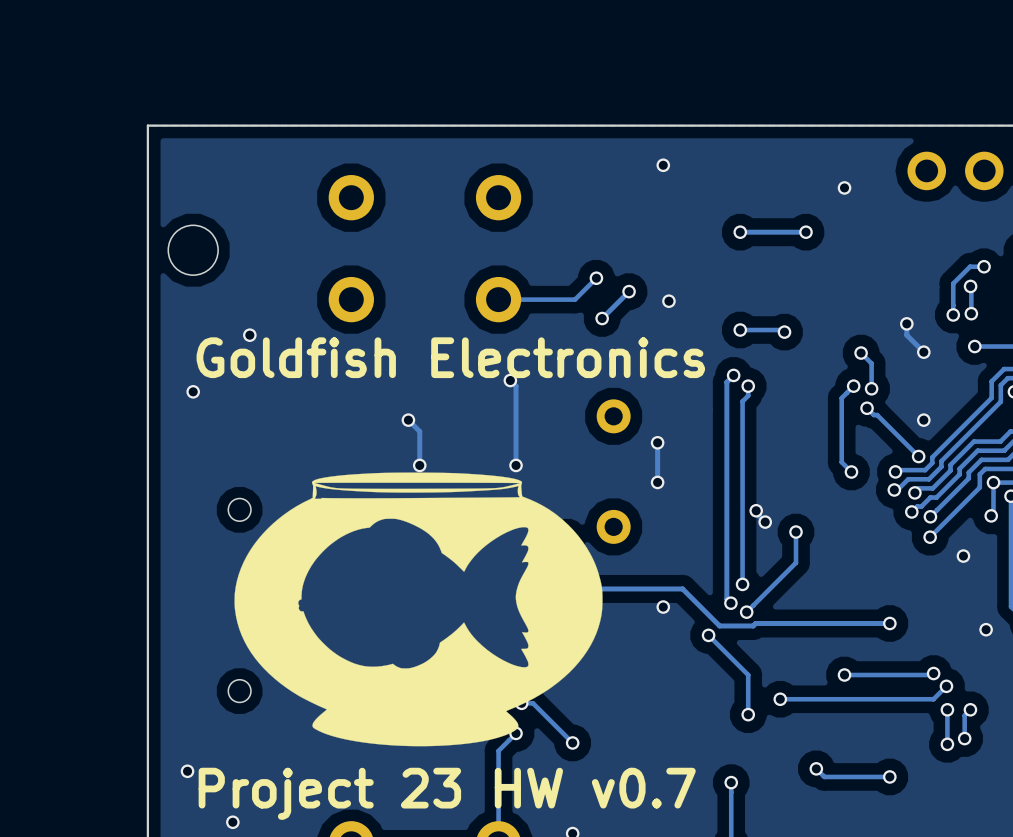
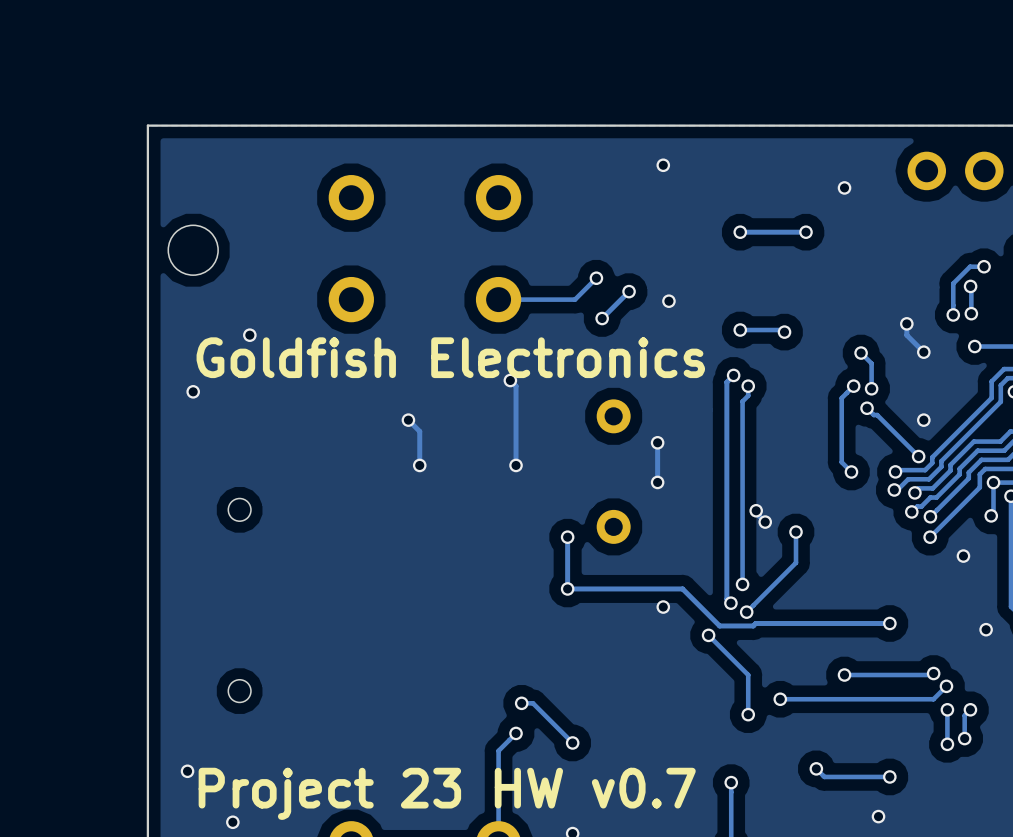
drawing: [234, 472, 603, 747] -> none
via: none -> (878, 816)

